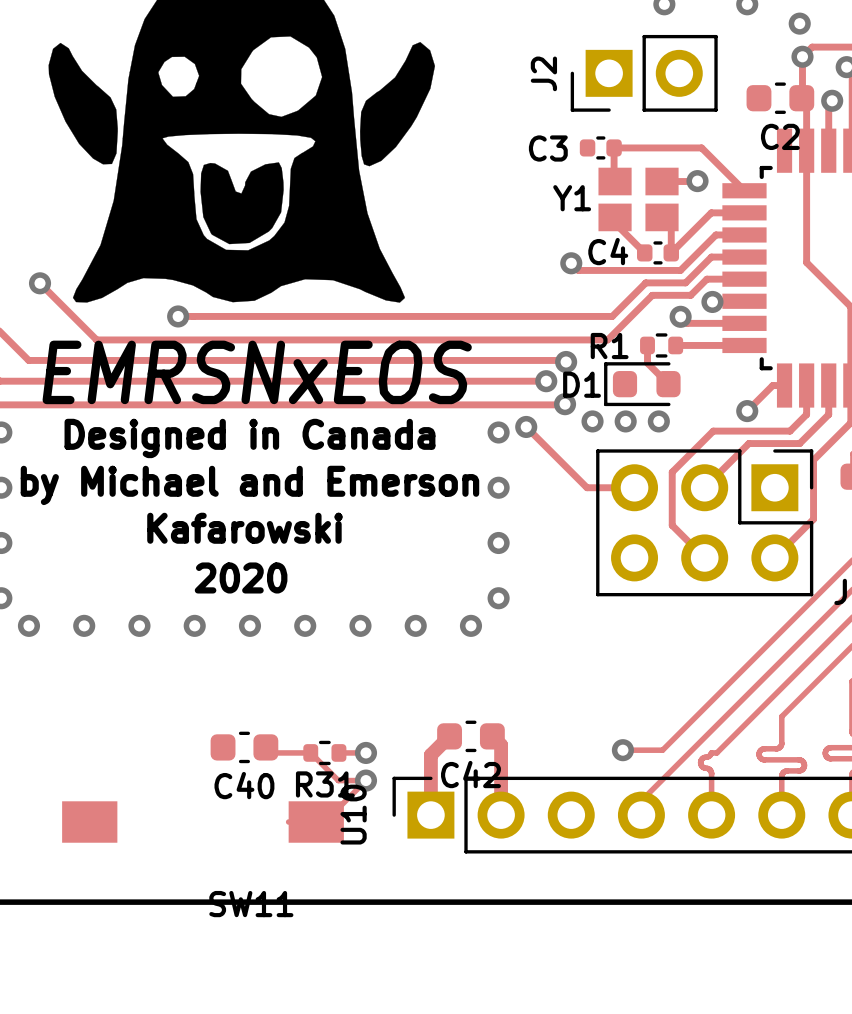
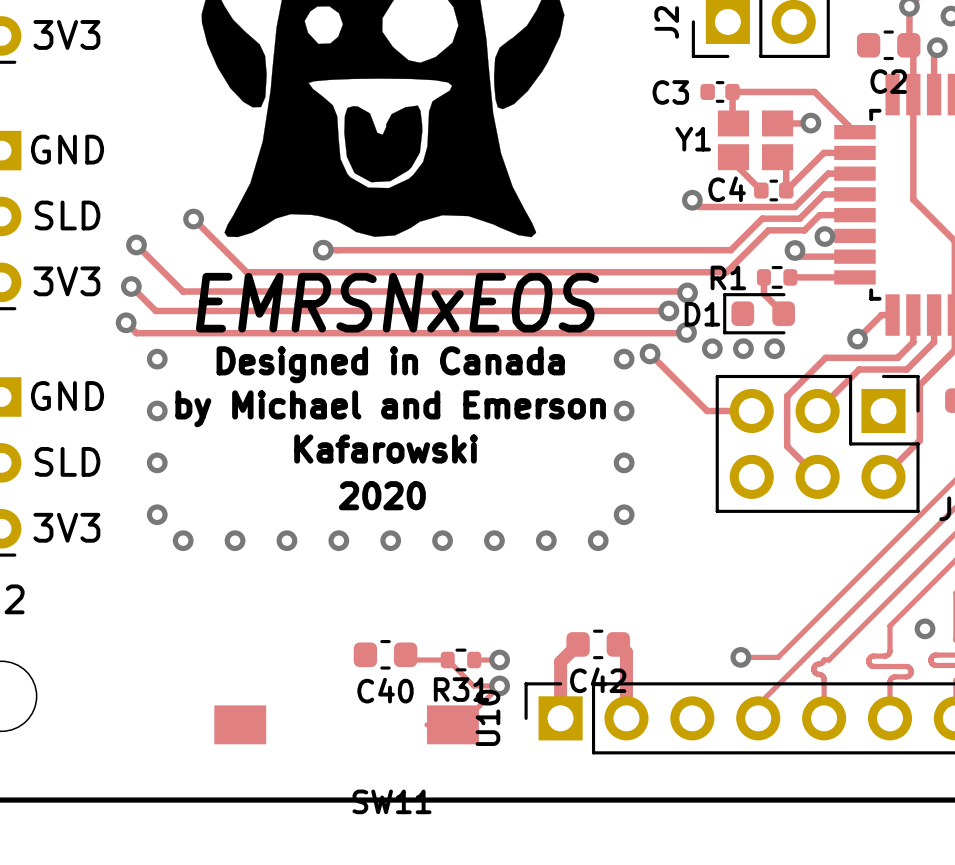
via: none -> (925, 628)

